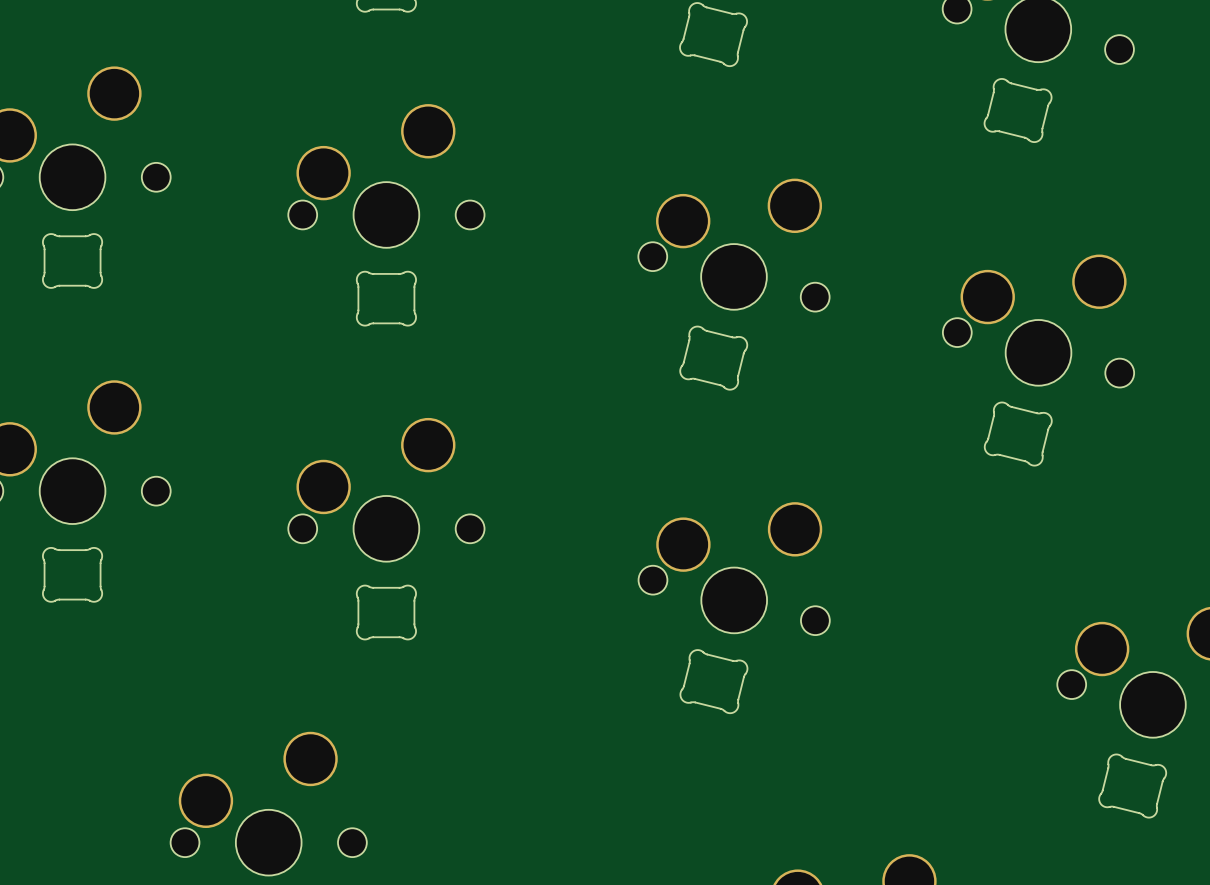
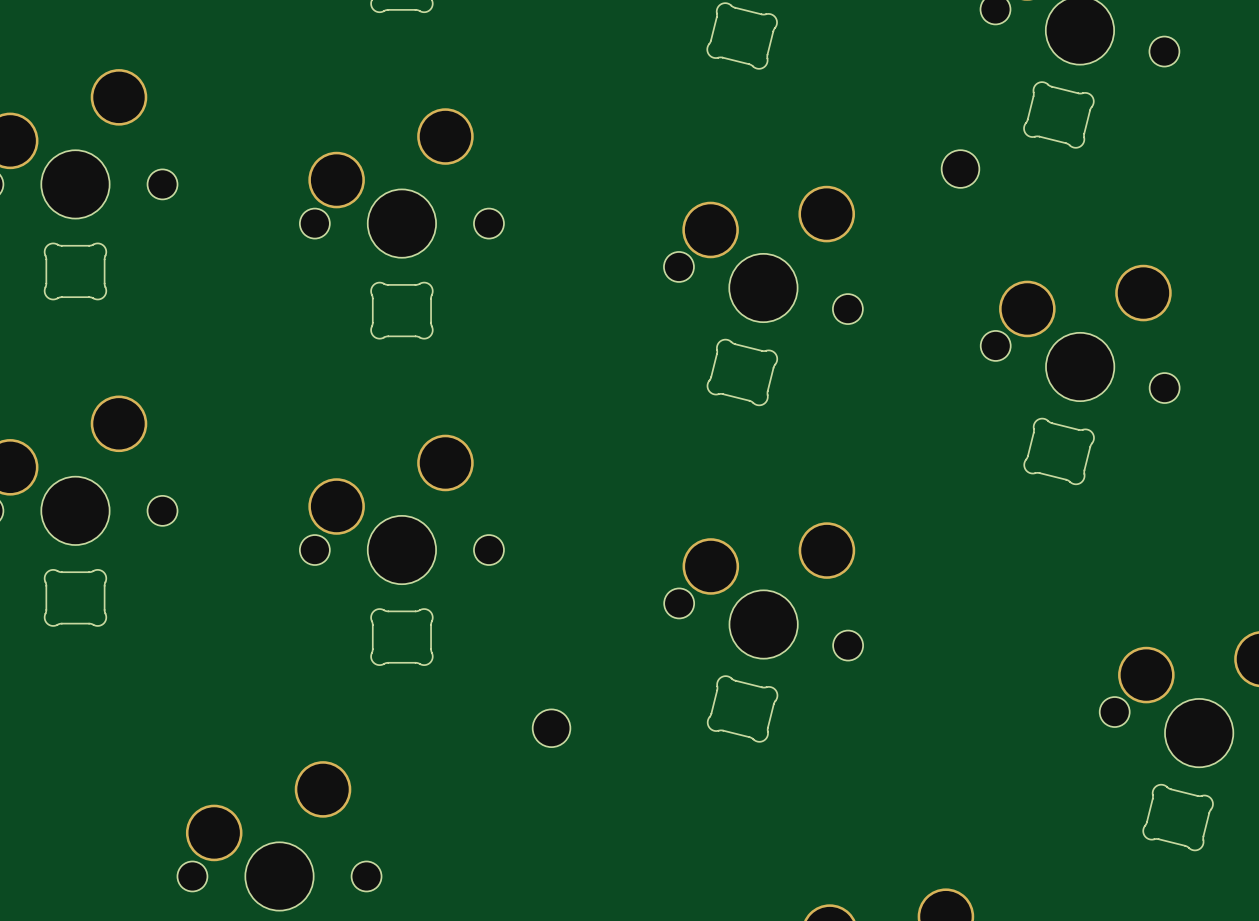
part: none -> (960, 169)
part: none -> (551, 728)

